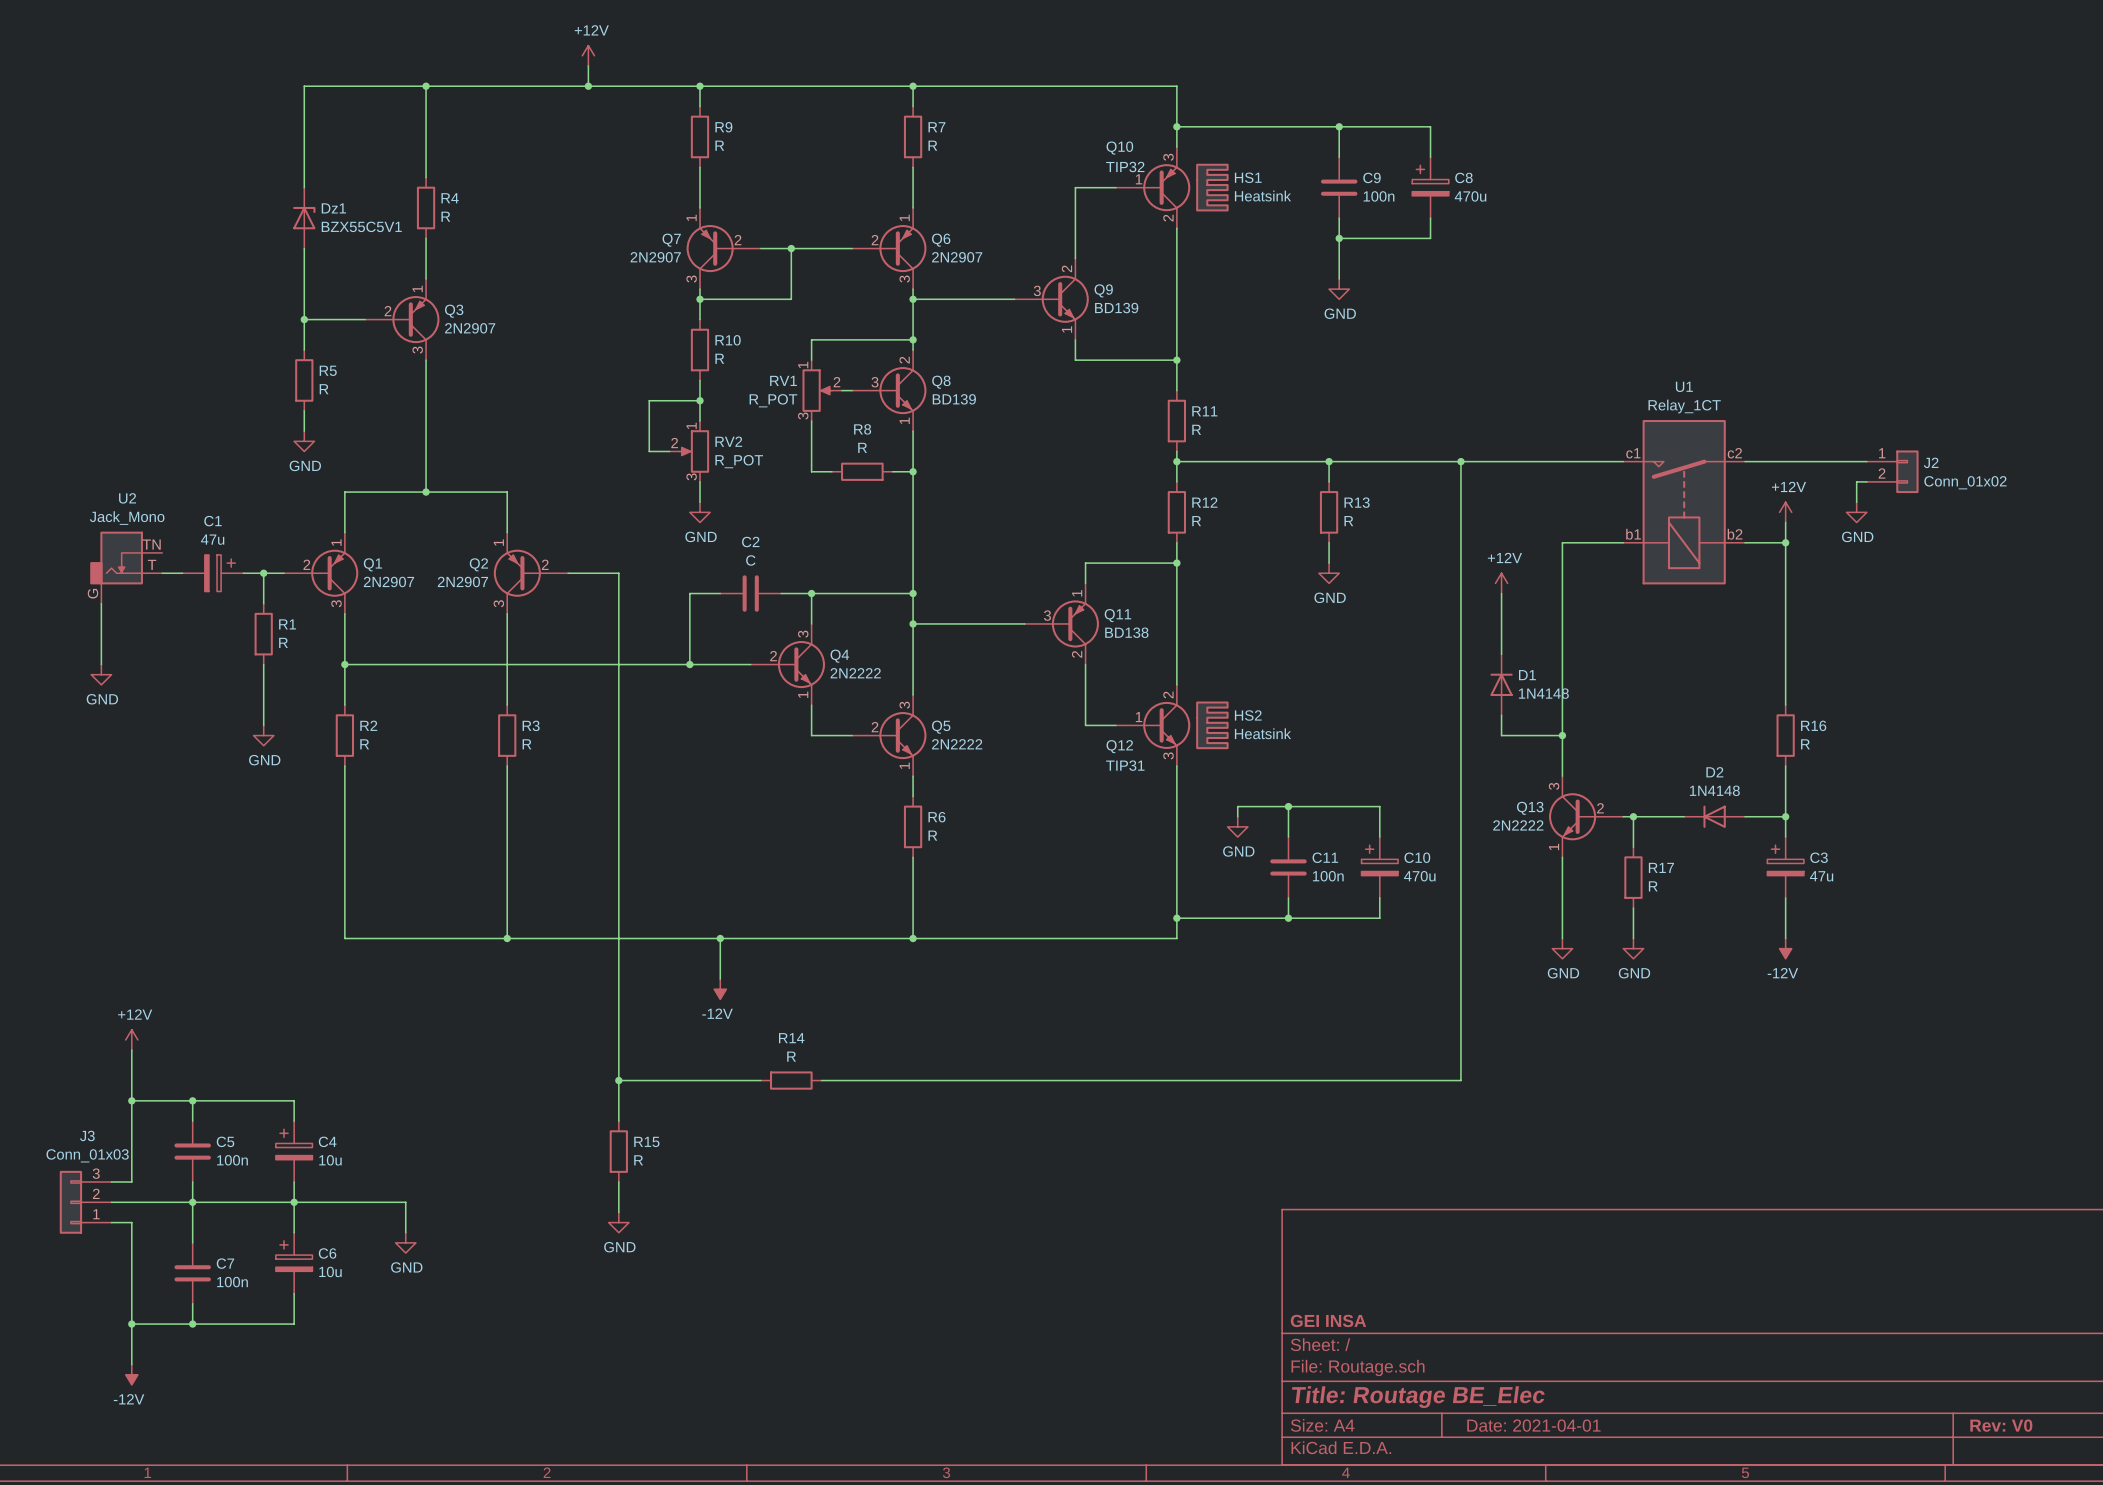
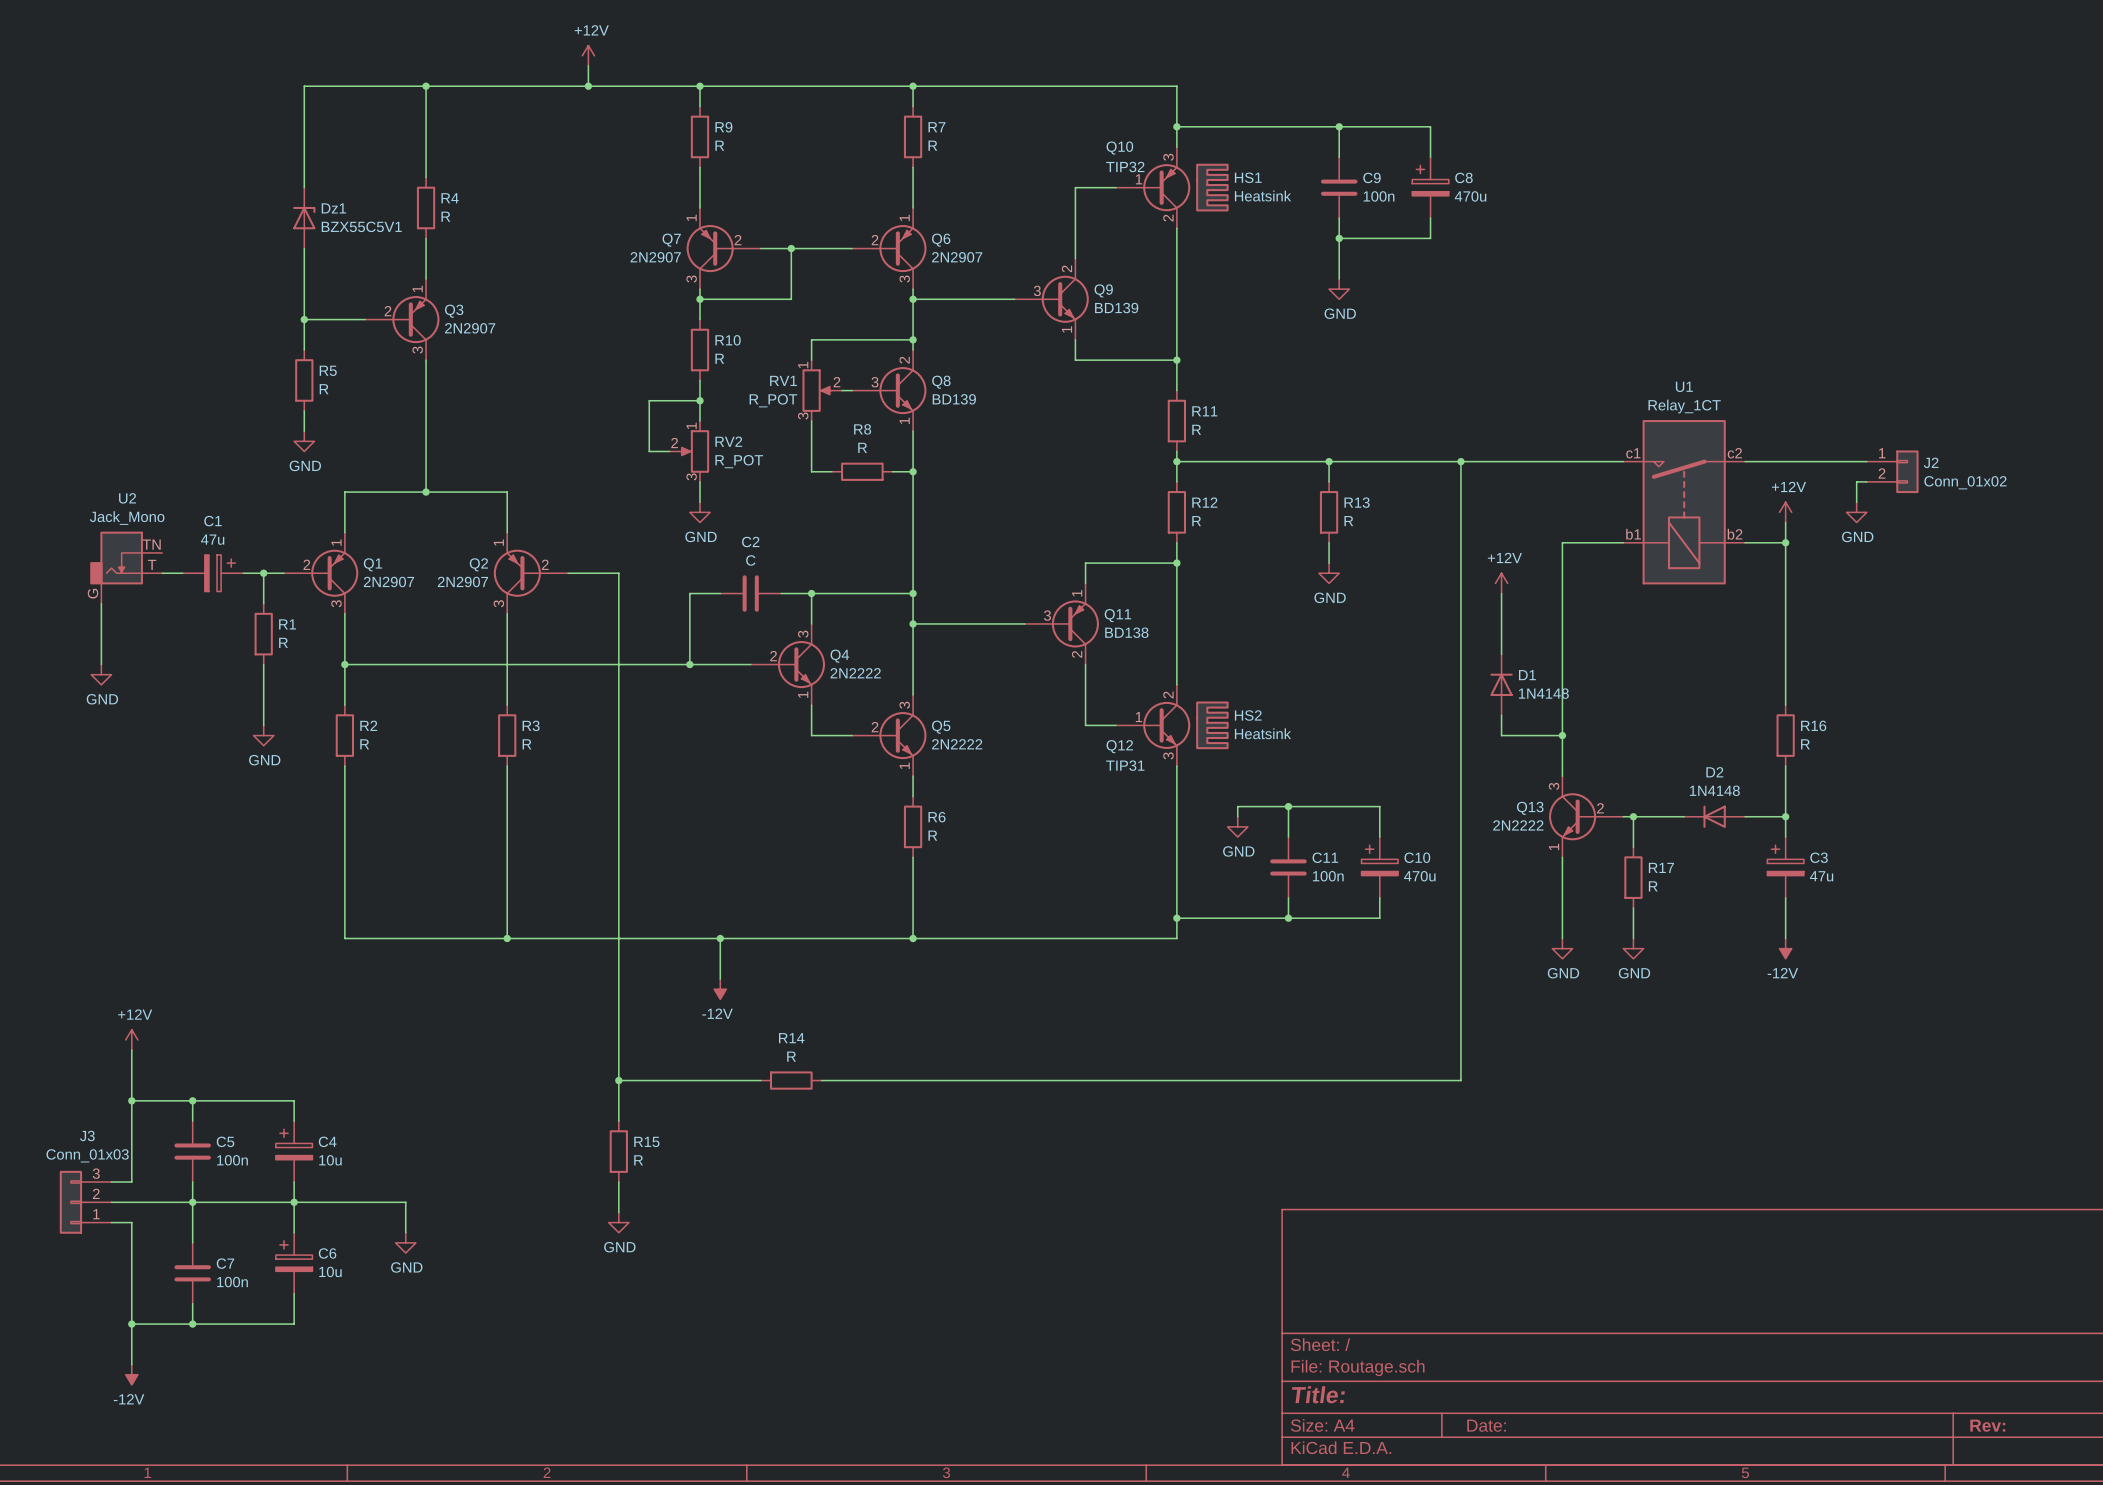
title block: GEI INSA (1328, 1320) -> none
title block: Title: Routage BE_Elec (1418, 1397) -> Title: (1318, 1394)
title block: Date: 2021-04-01 (1533, 1425) -> Date: (1486, 1425)
title block: Rev: V0 (2001, 1425) -> Rev: (1987, 1425)

